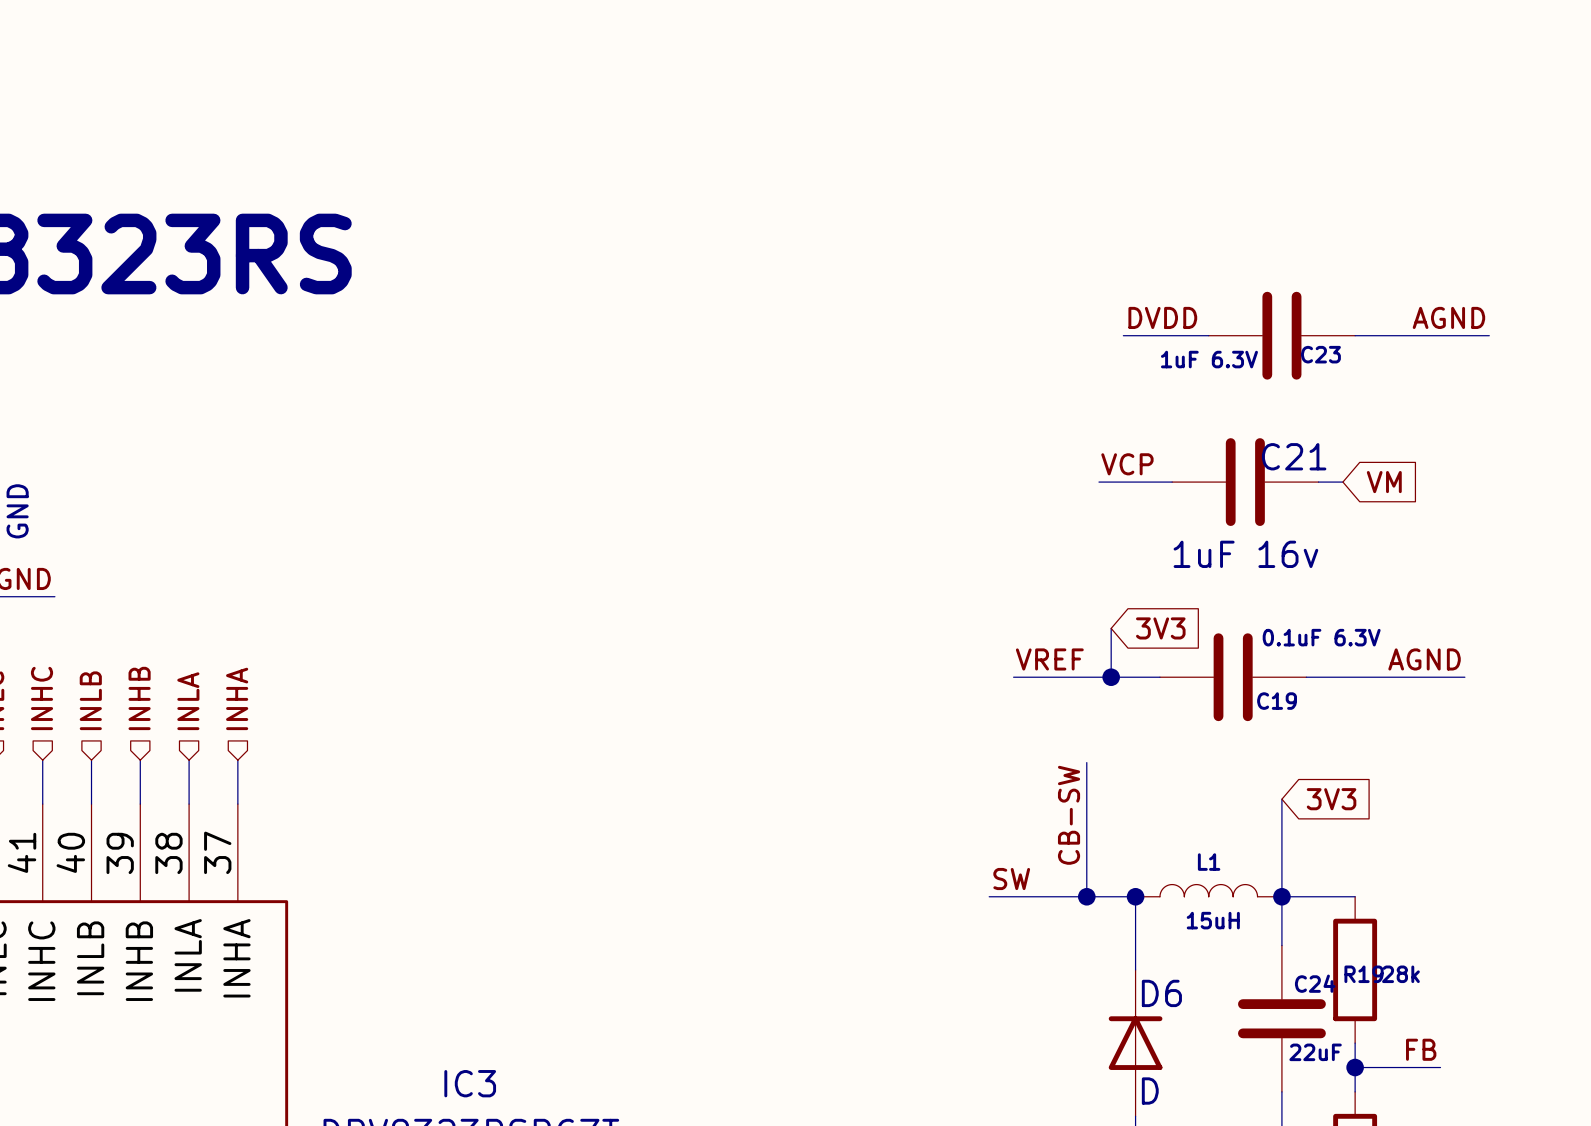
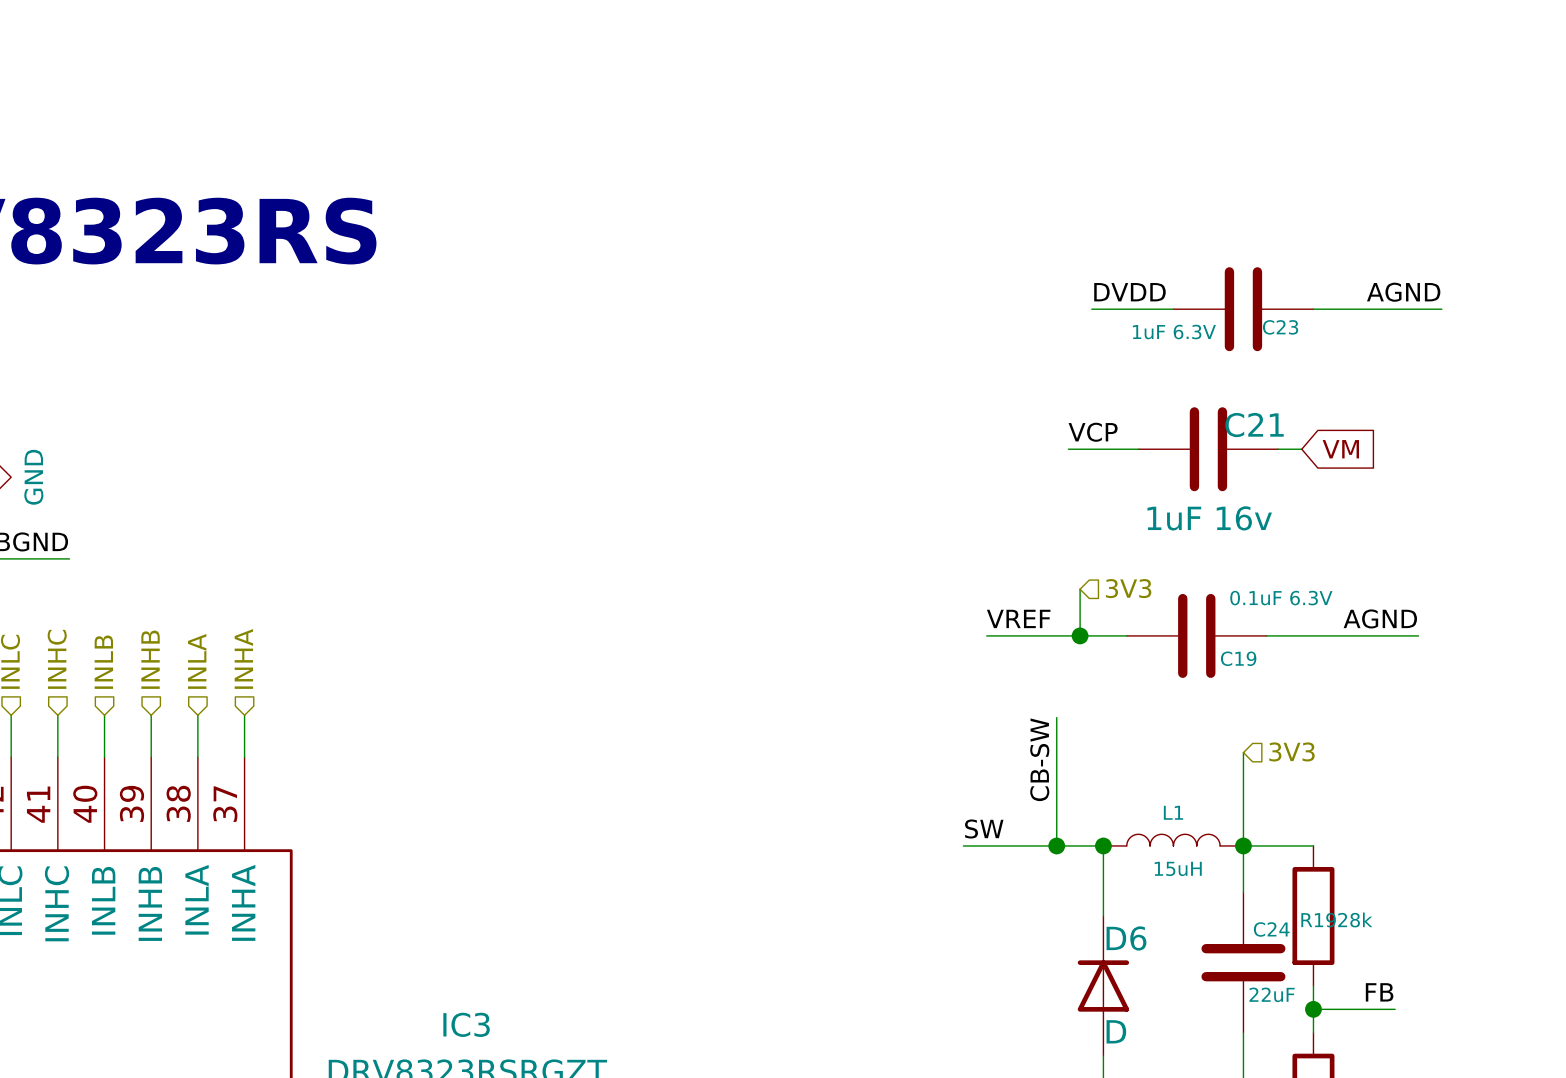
hierarchical label: none -> 3V3 (1128, 588)
global label: 3V3 (1160, 628) -> none
hierarchical label: none -> 3V3 (1291, 751)
global label: 3V3 (1331, 799) -> none

